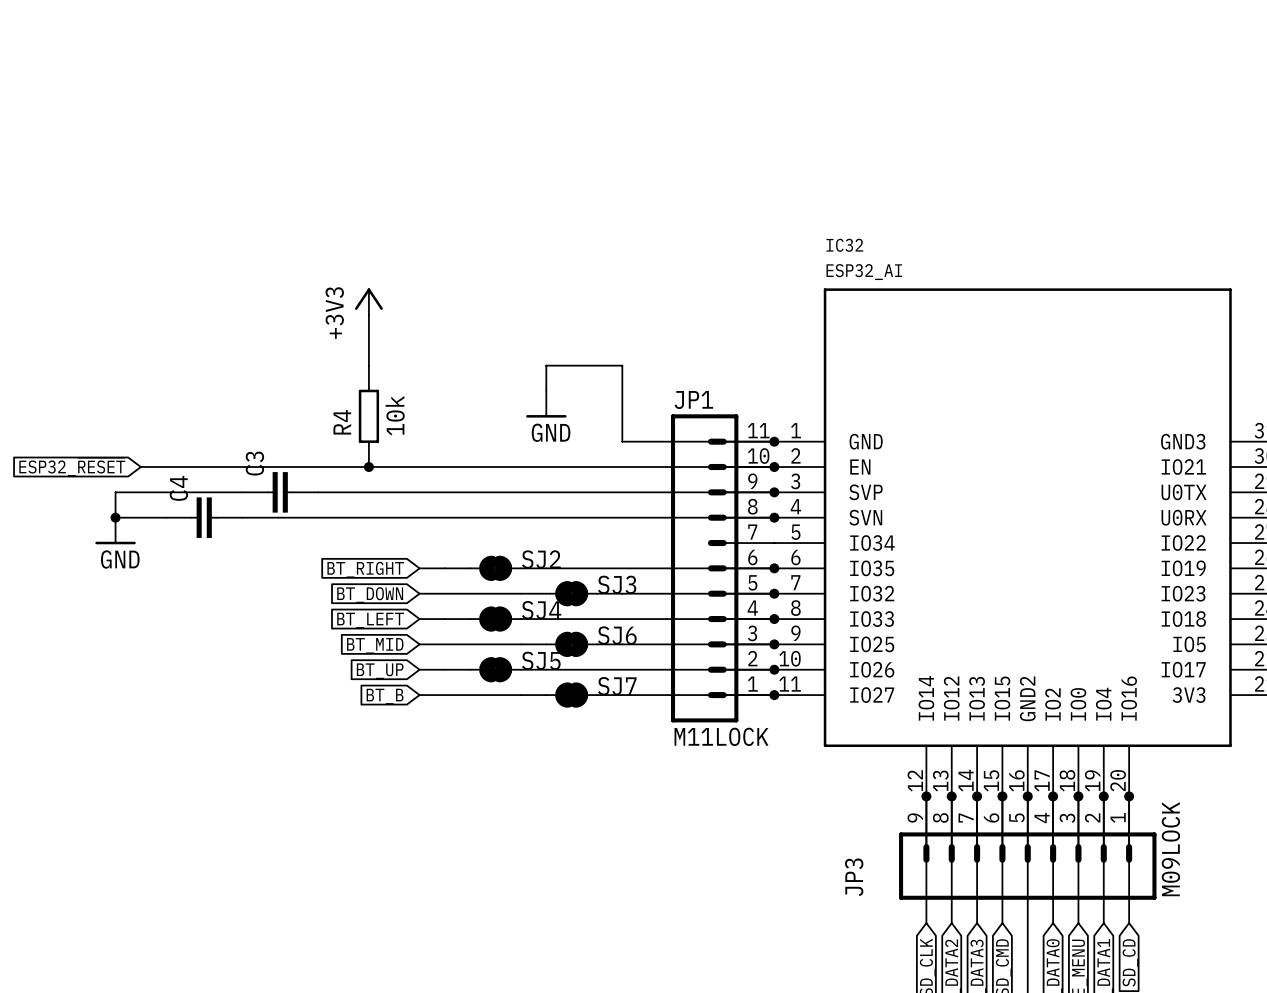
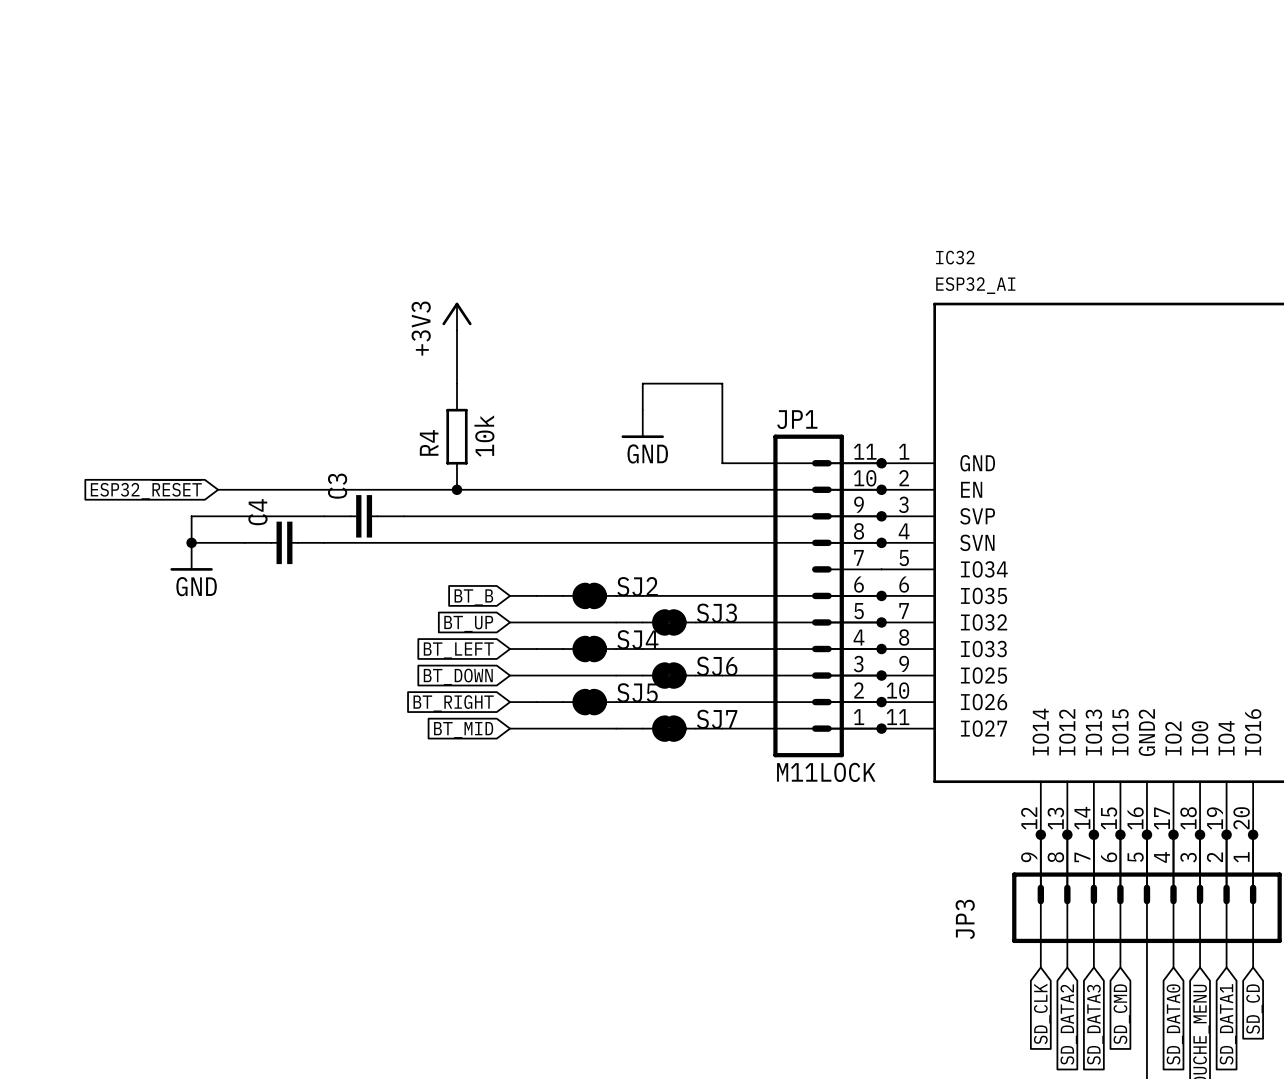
global label: BT_RIGHT (365, 569) -> BT_B (473, 597)
global label: BT_DOWN (370, 595) -> BT_UP (468, 624)
global label: BT_MID (375, 645) -> BT_DOWN (458, 677)
global label: BT_UP (380, 671) -> BT_RIGHT (453, 703)
global label: BT_B (385, 696) -> BT_MID (463, 730)

